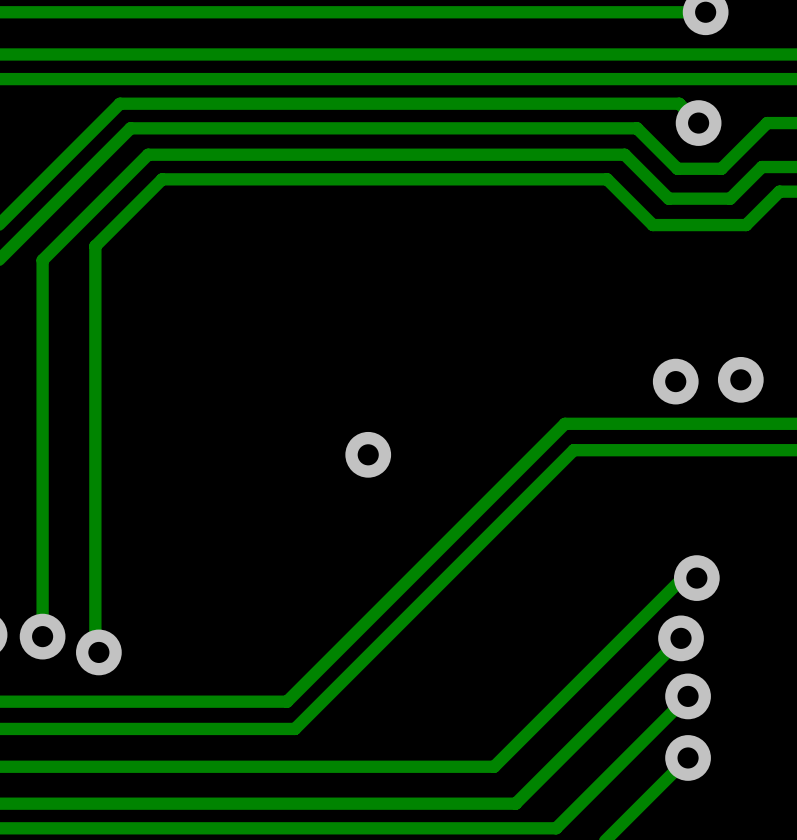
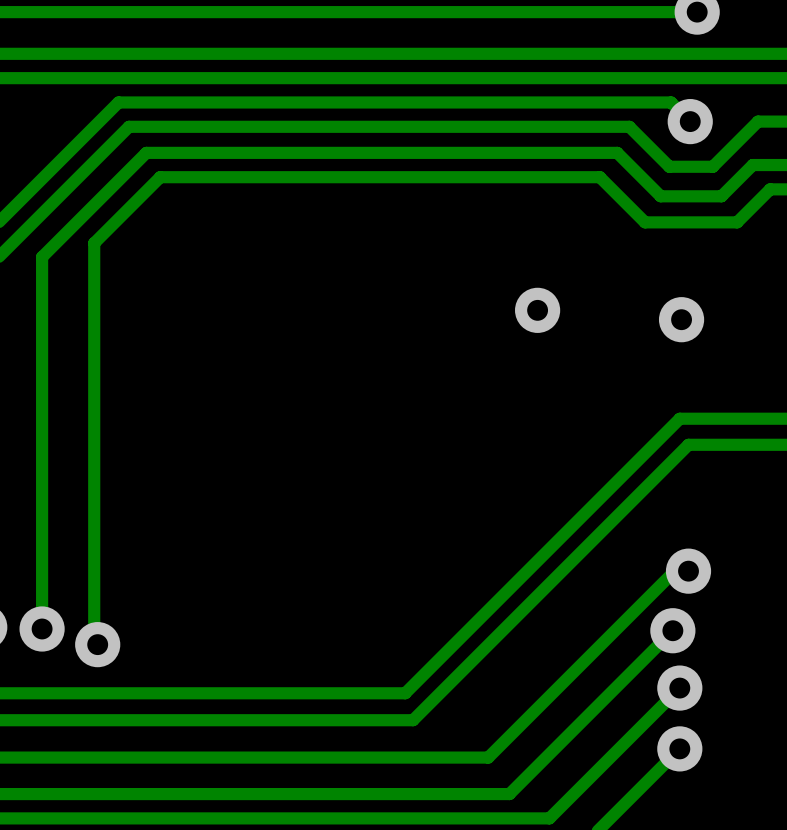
via: none -> (537, 310)
via: none -> (681, 319)
via: (740, 379) -> none
via: (675, 381) -> none
track: (688, 423) (564, 423) (287, 701) -> (679, 418) (405, 693) (283, 693)
track: (696, 450) (573, 450) (294, 728) -> (688, 444) (413, 720) (291, 720)
via: (368, 454) -> none

